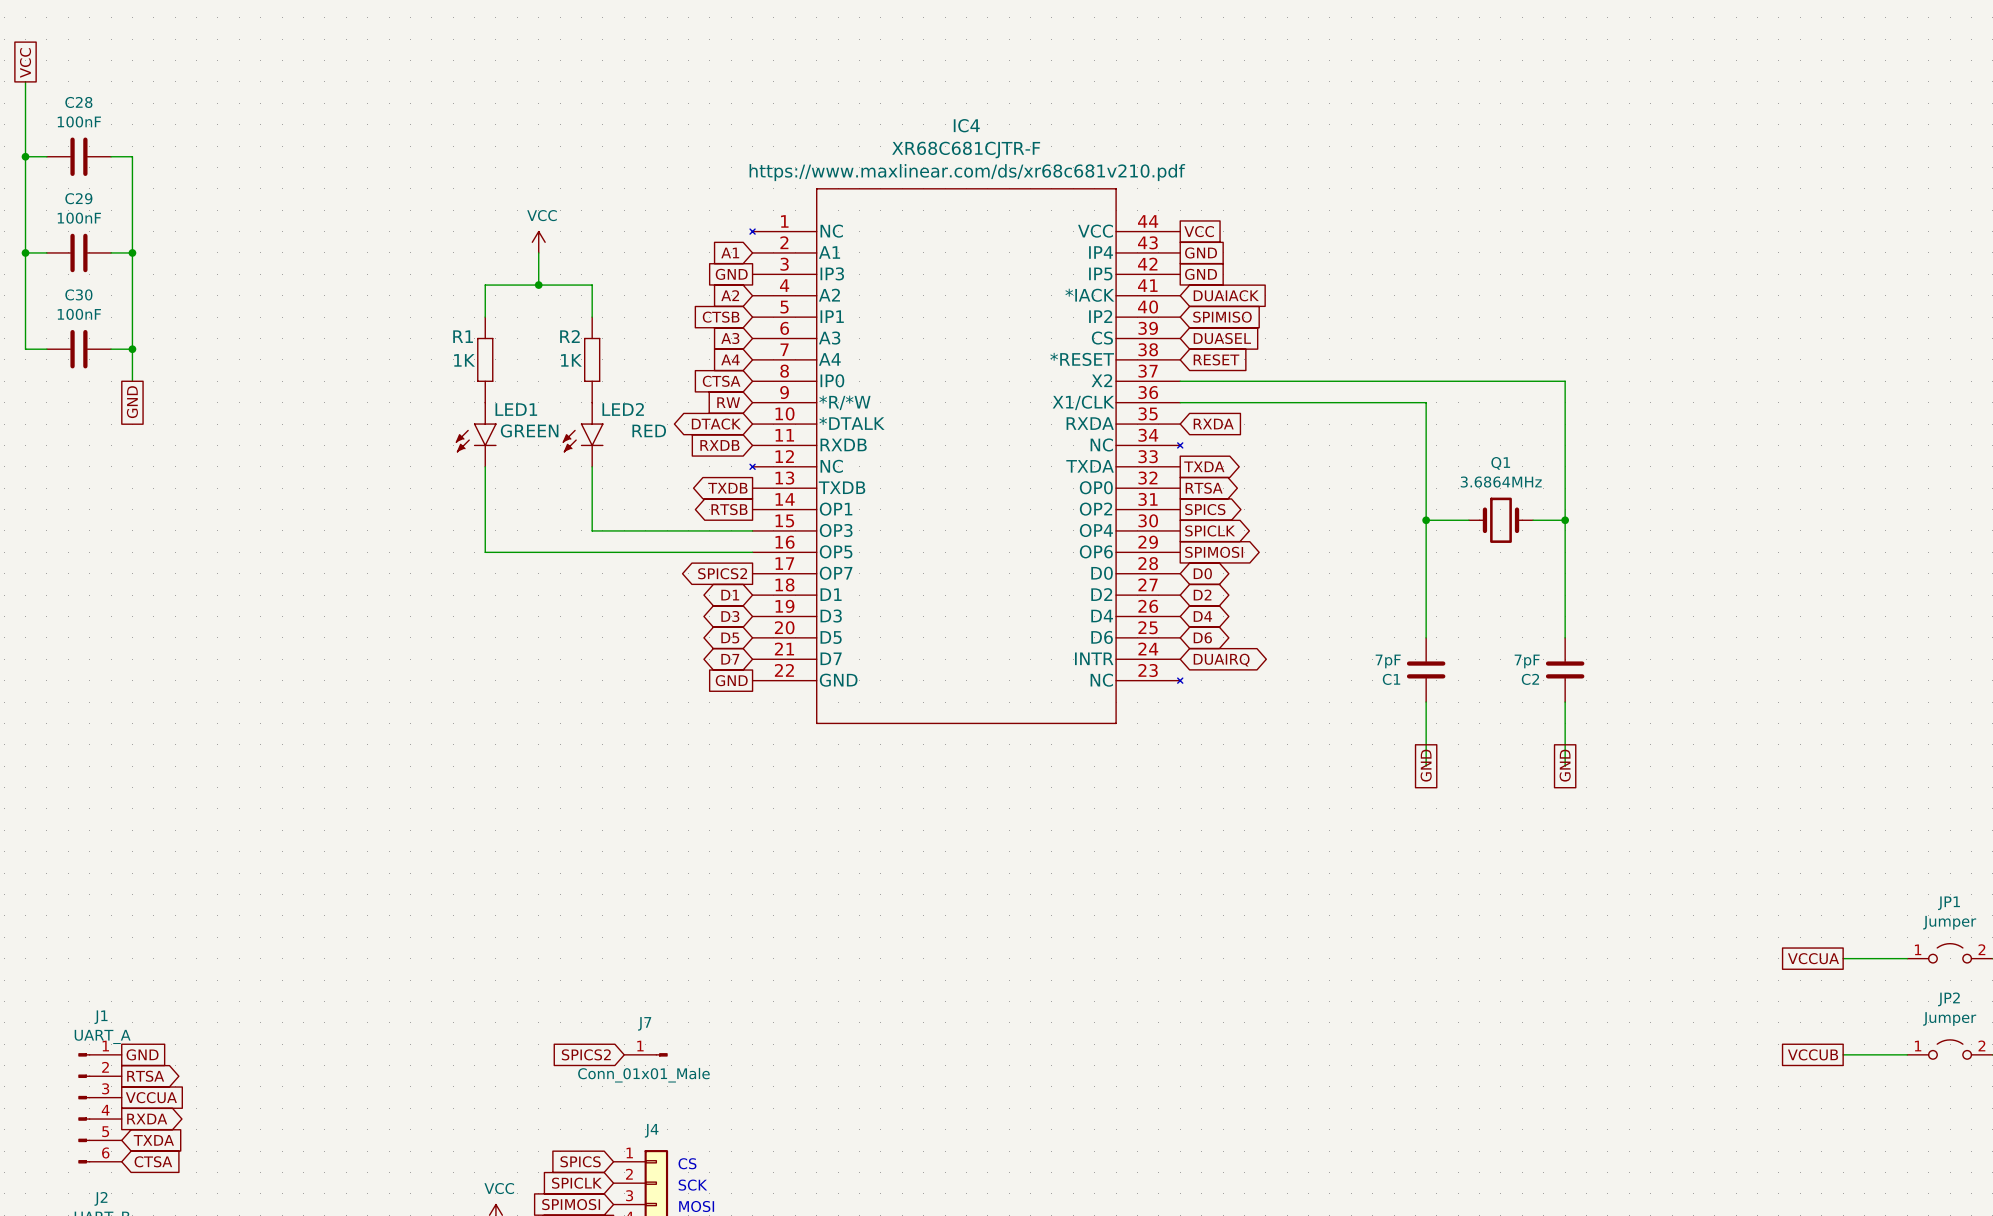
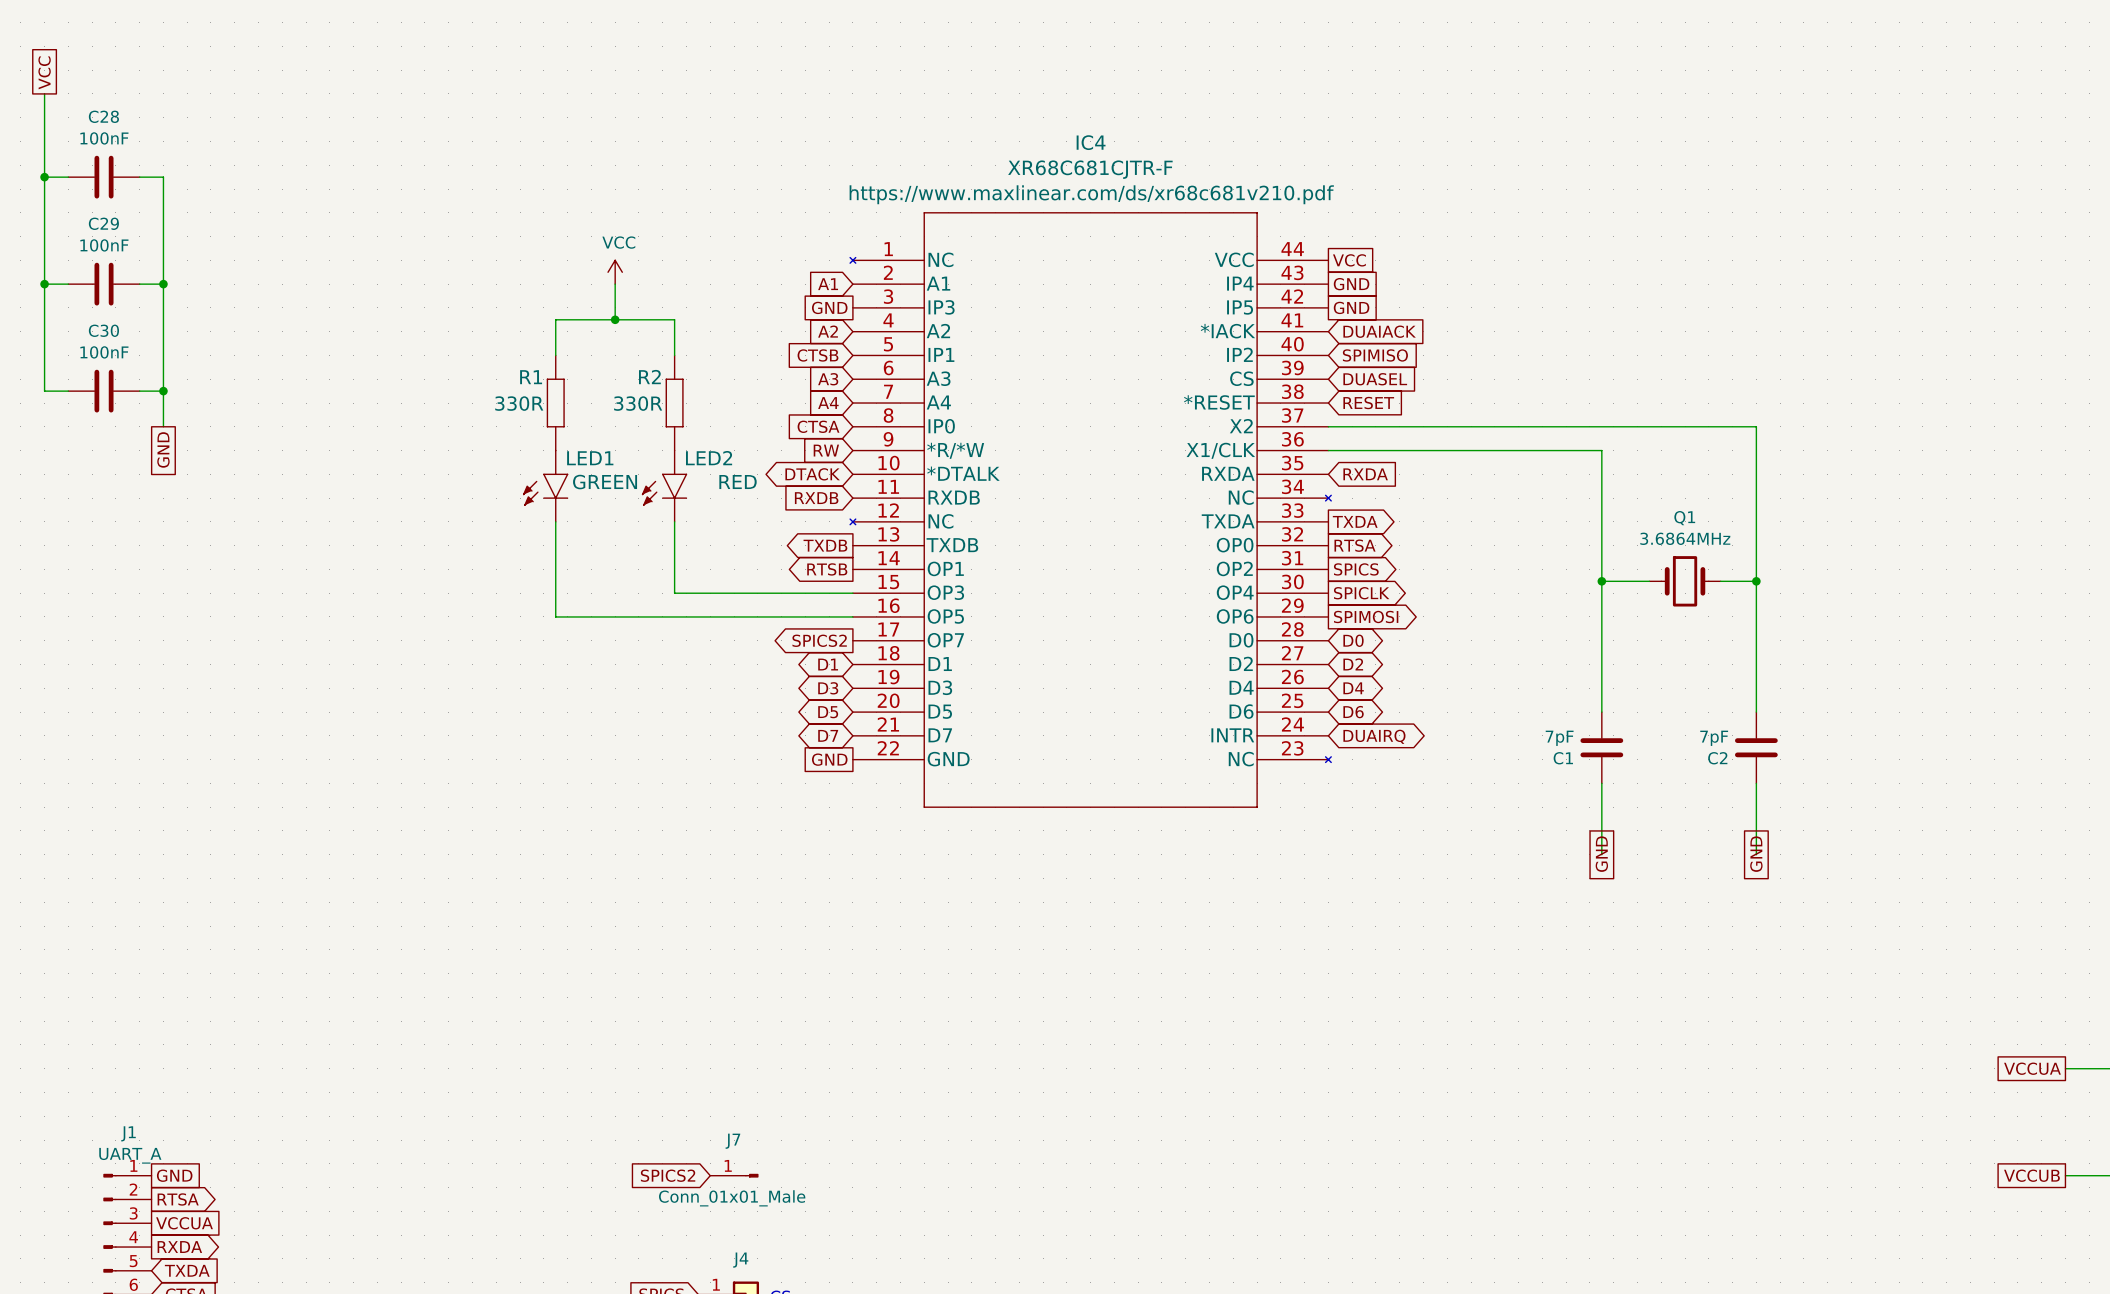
R1 value: 1K (464, 360) -> 330R (519, 403)
R2 value: 1K (571, 360) -> 330R (638, 403)

